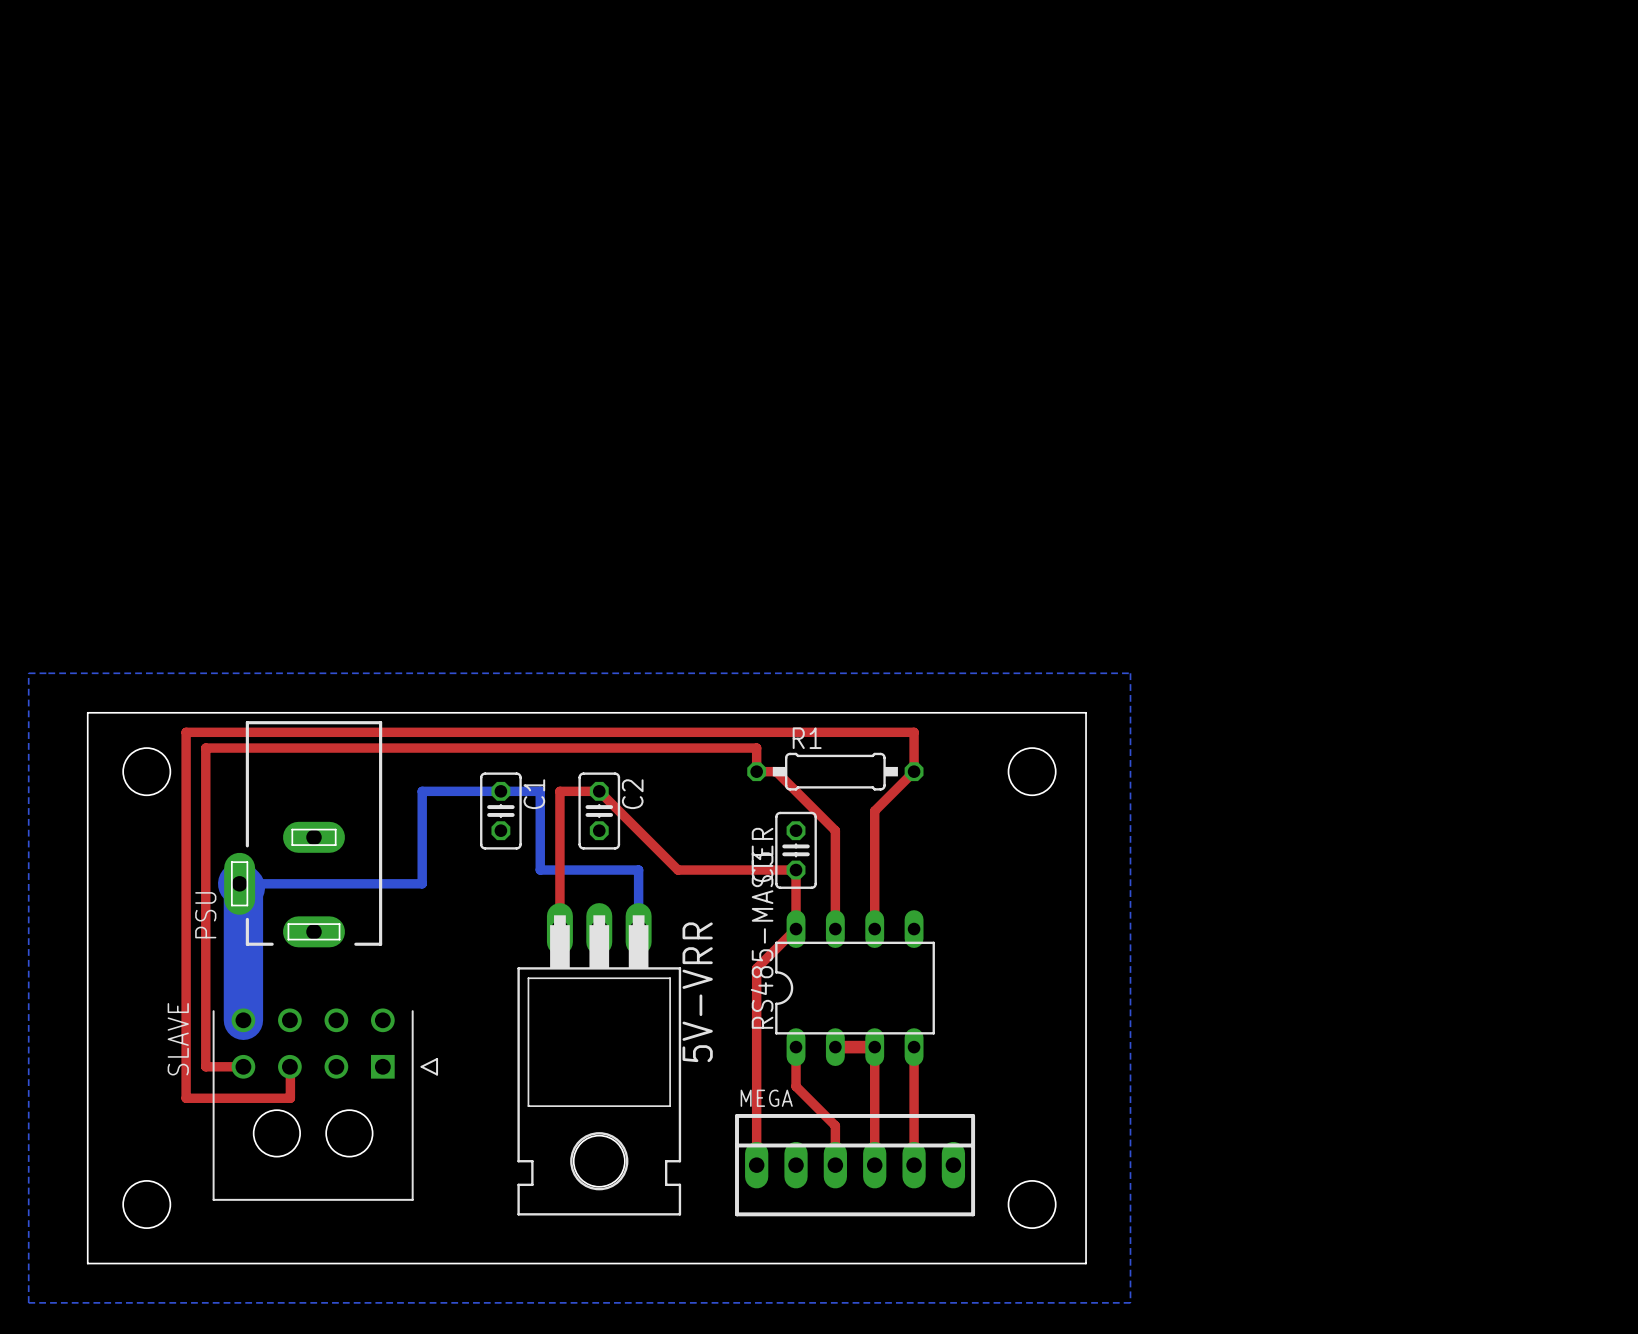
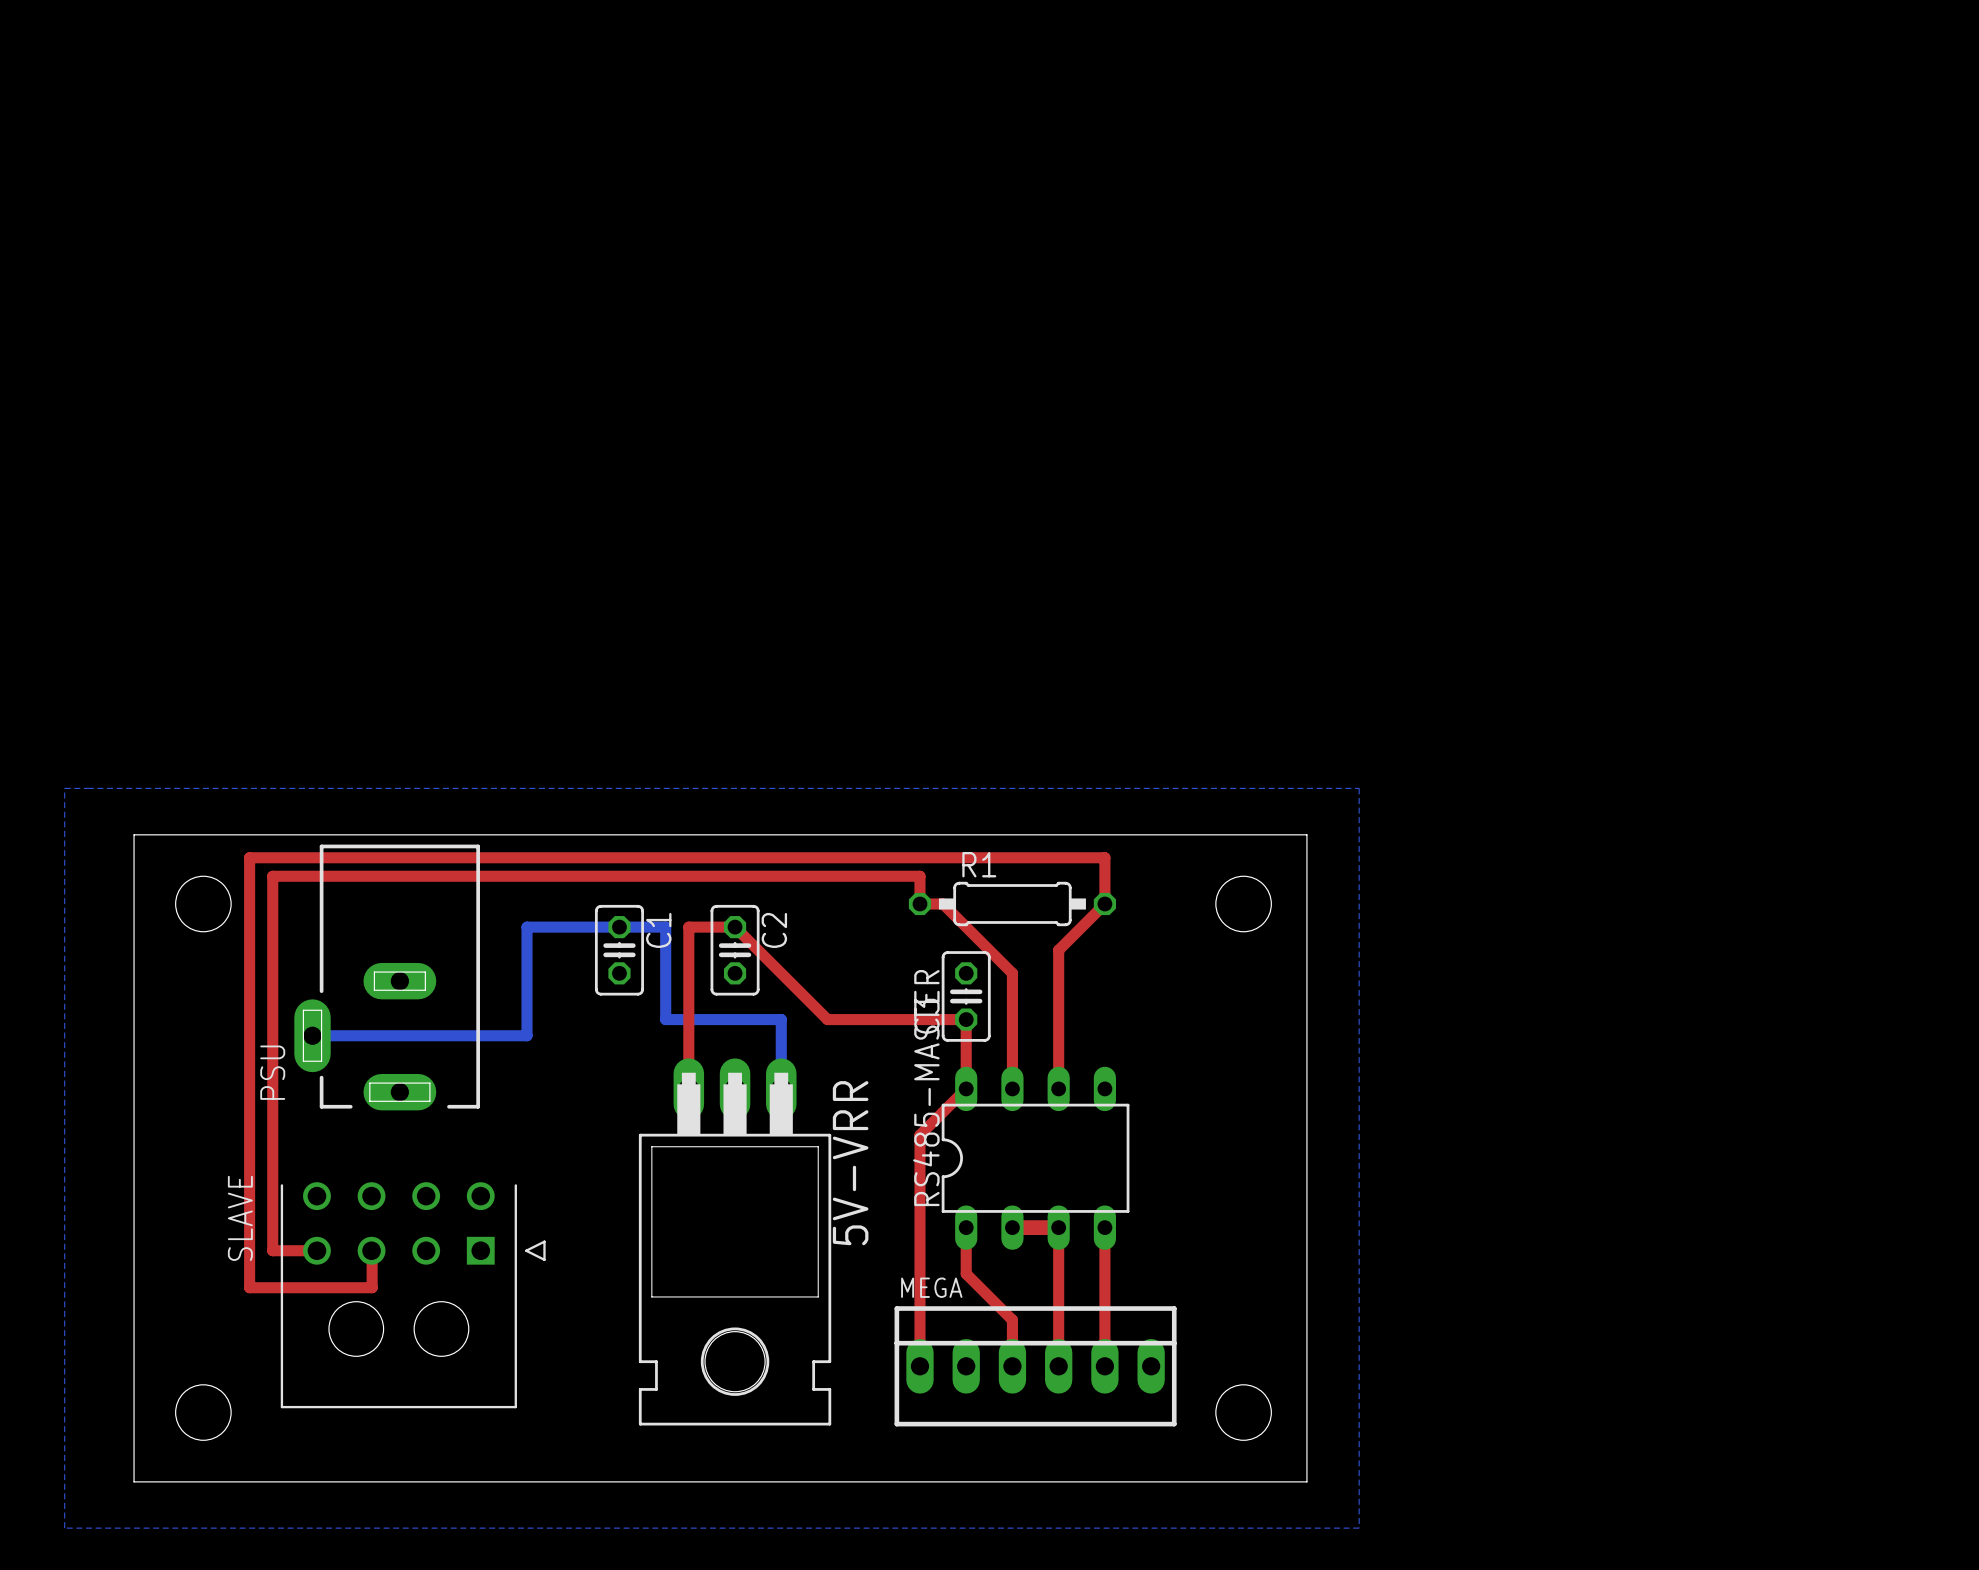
bottom track: (239, 883) (243, 887) (243, 1020) -> none

